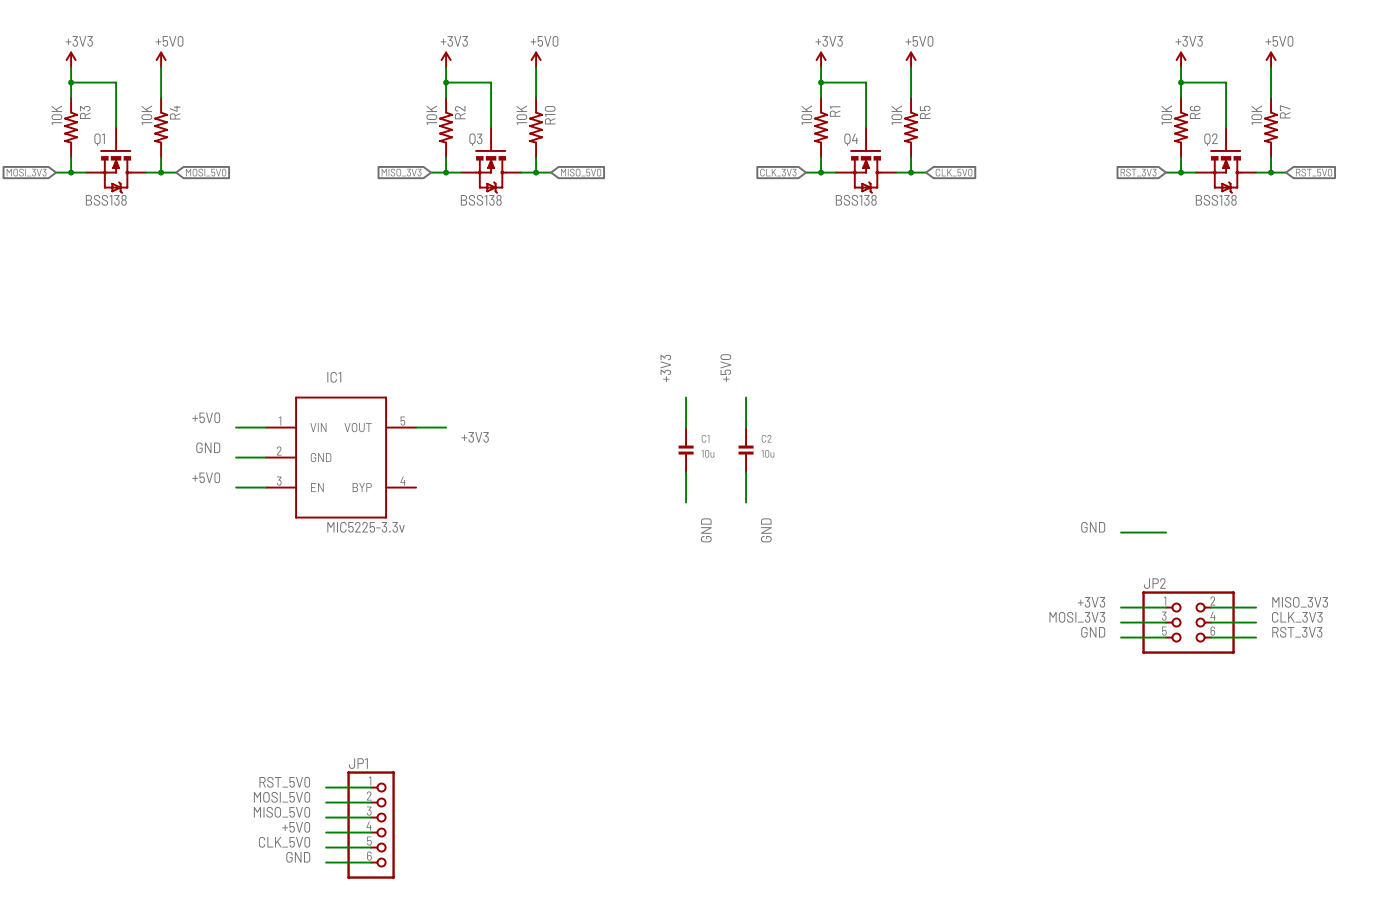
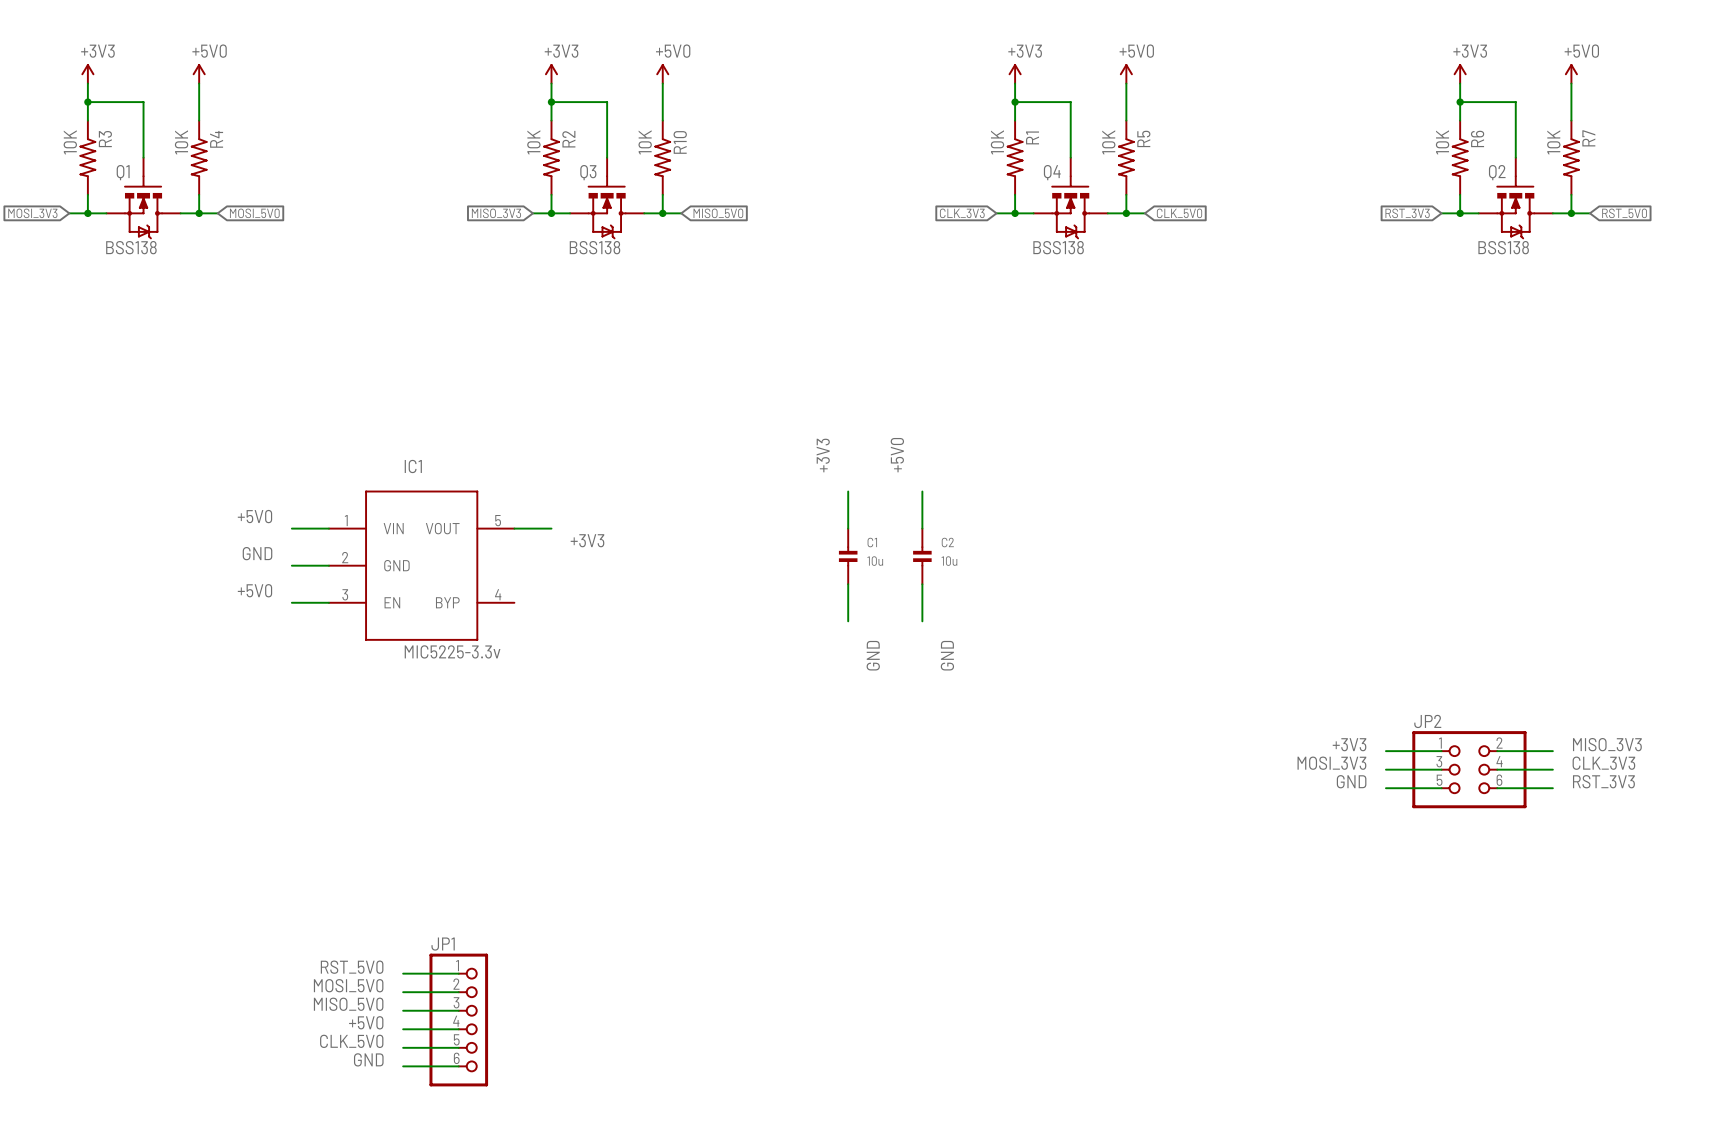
label: GND (1093, 527) -> none
wire: (1121, 532) (1166, 532) -> none

